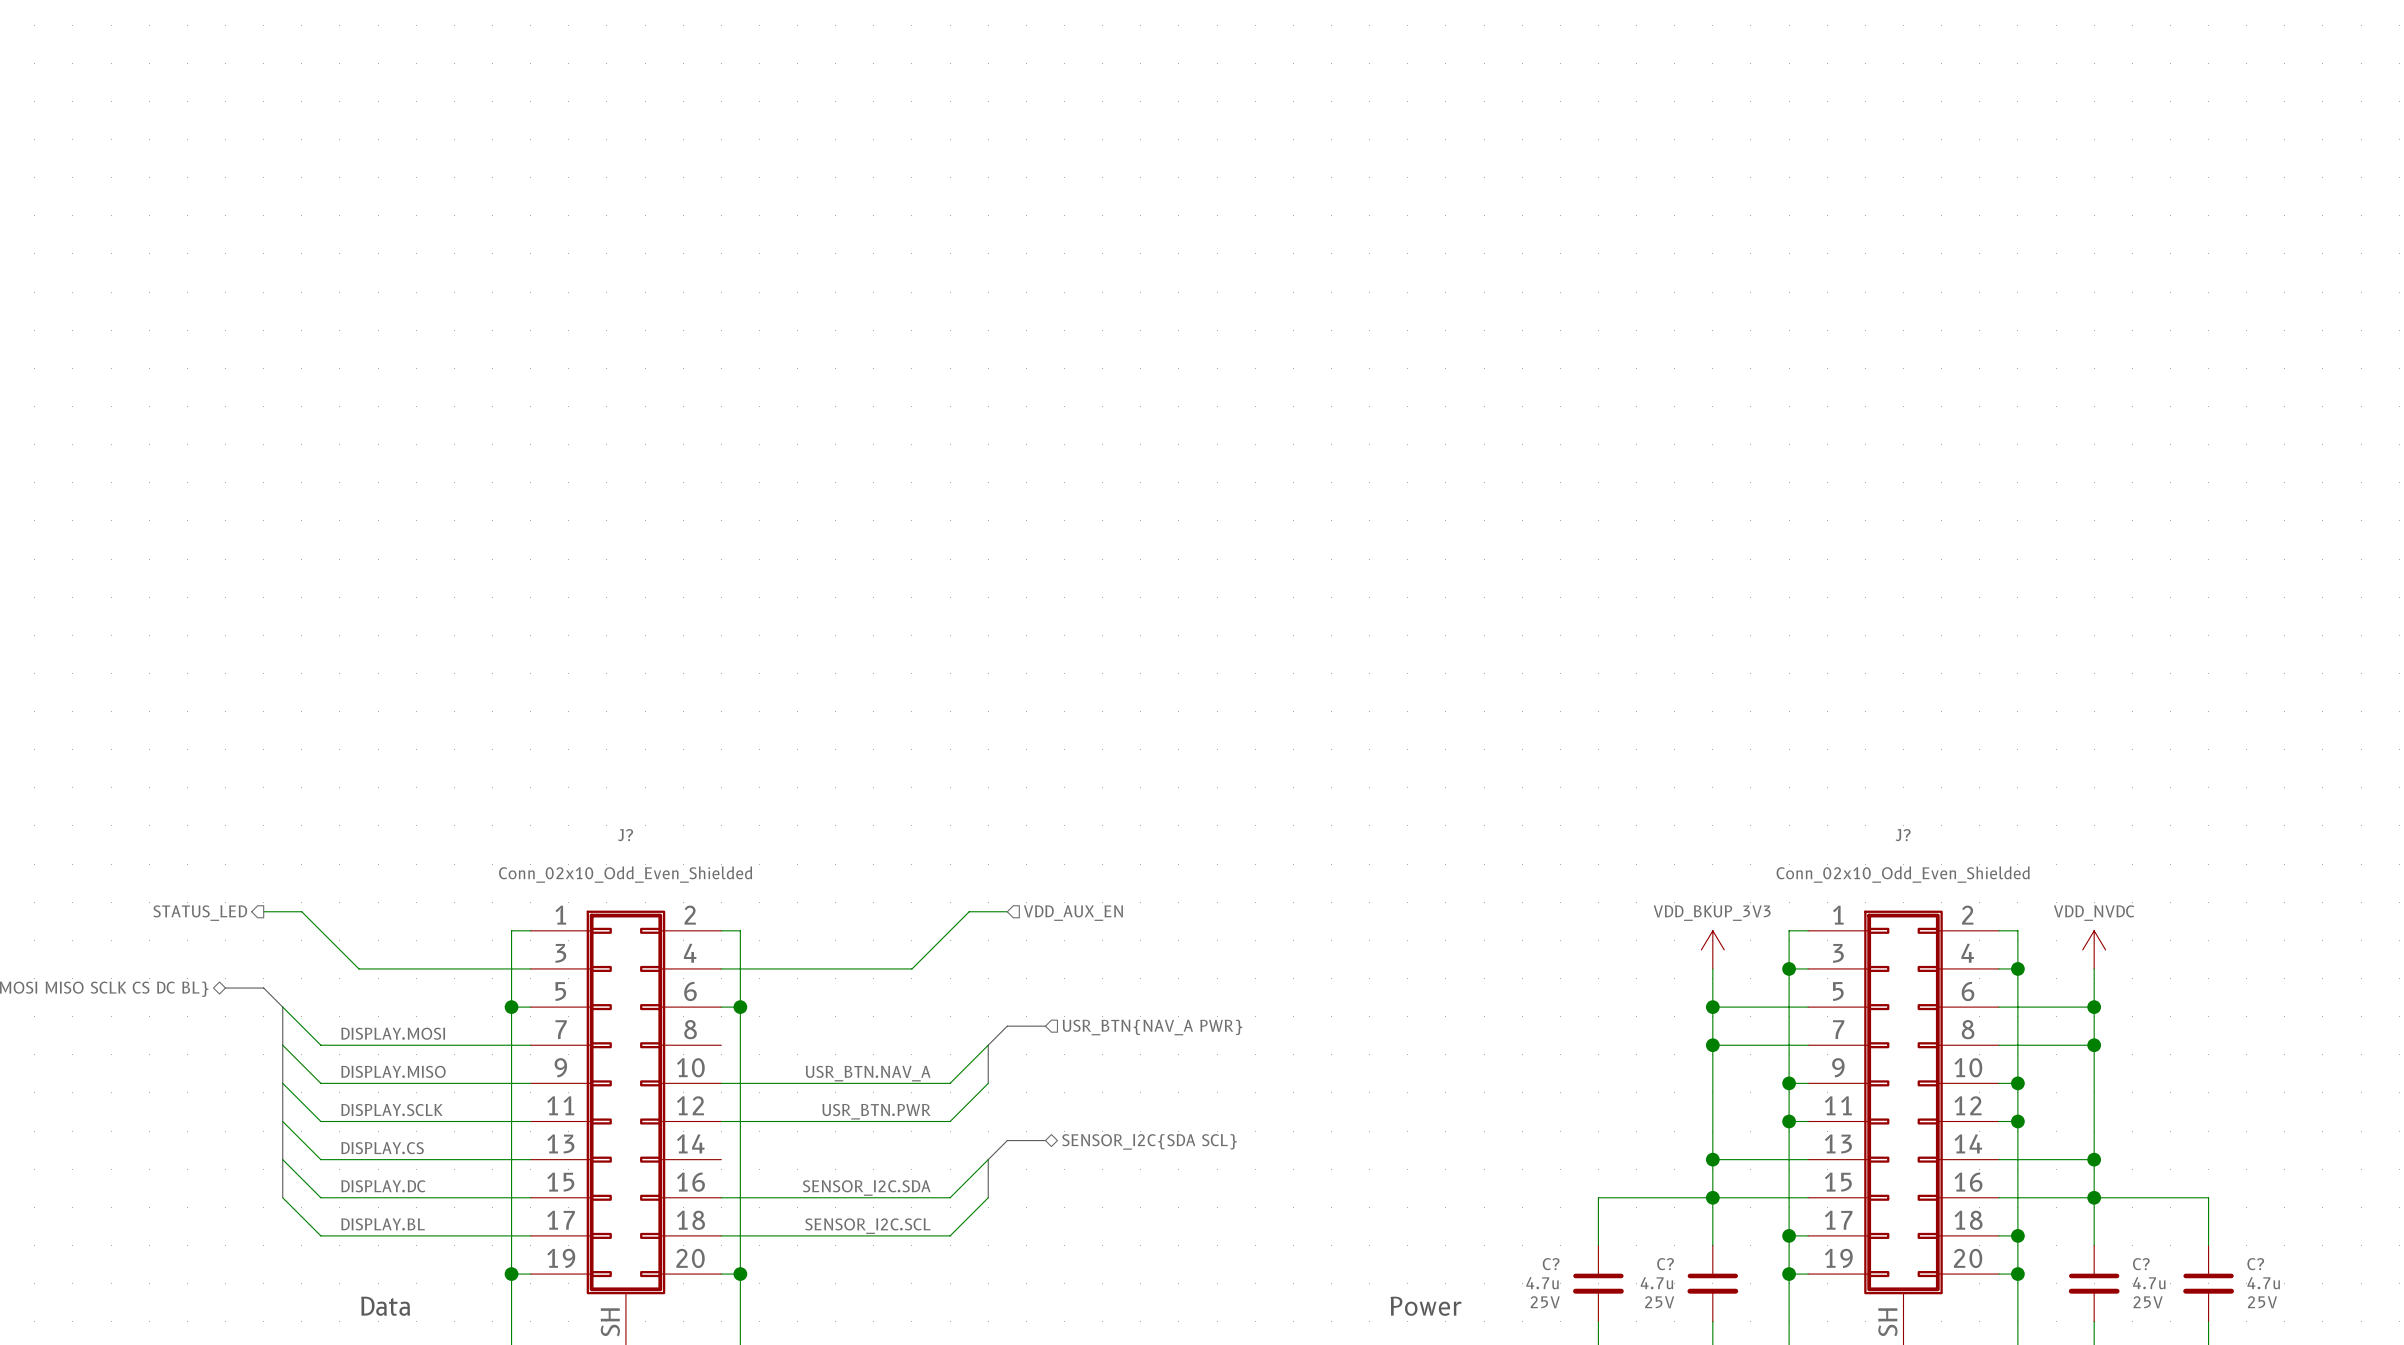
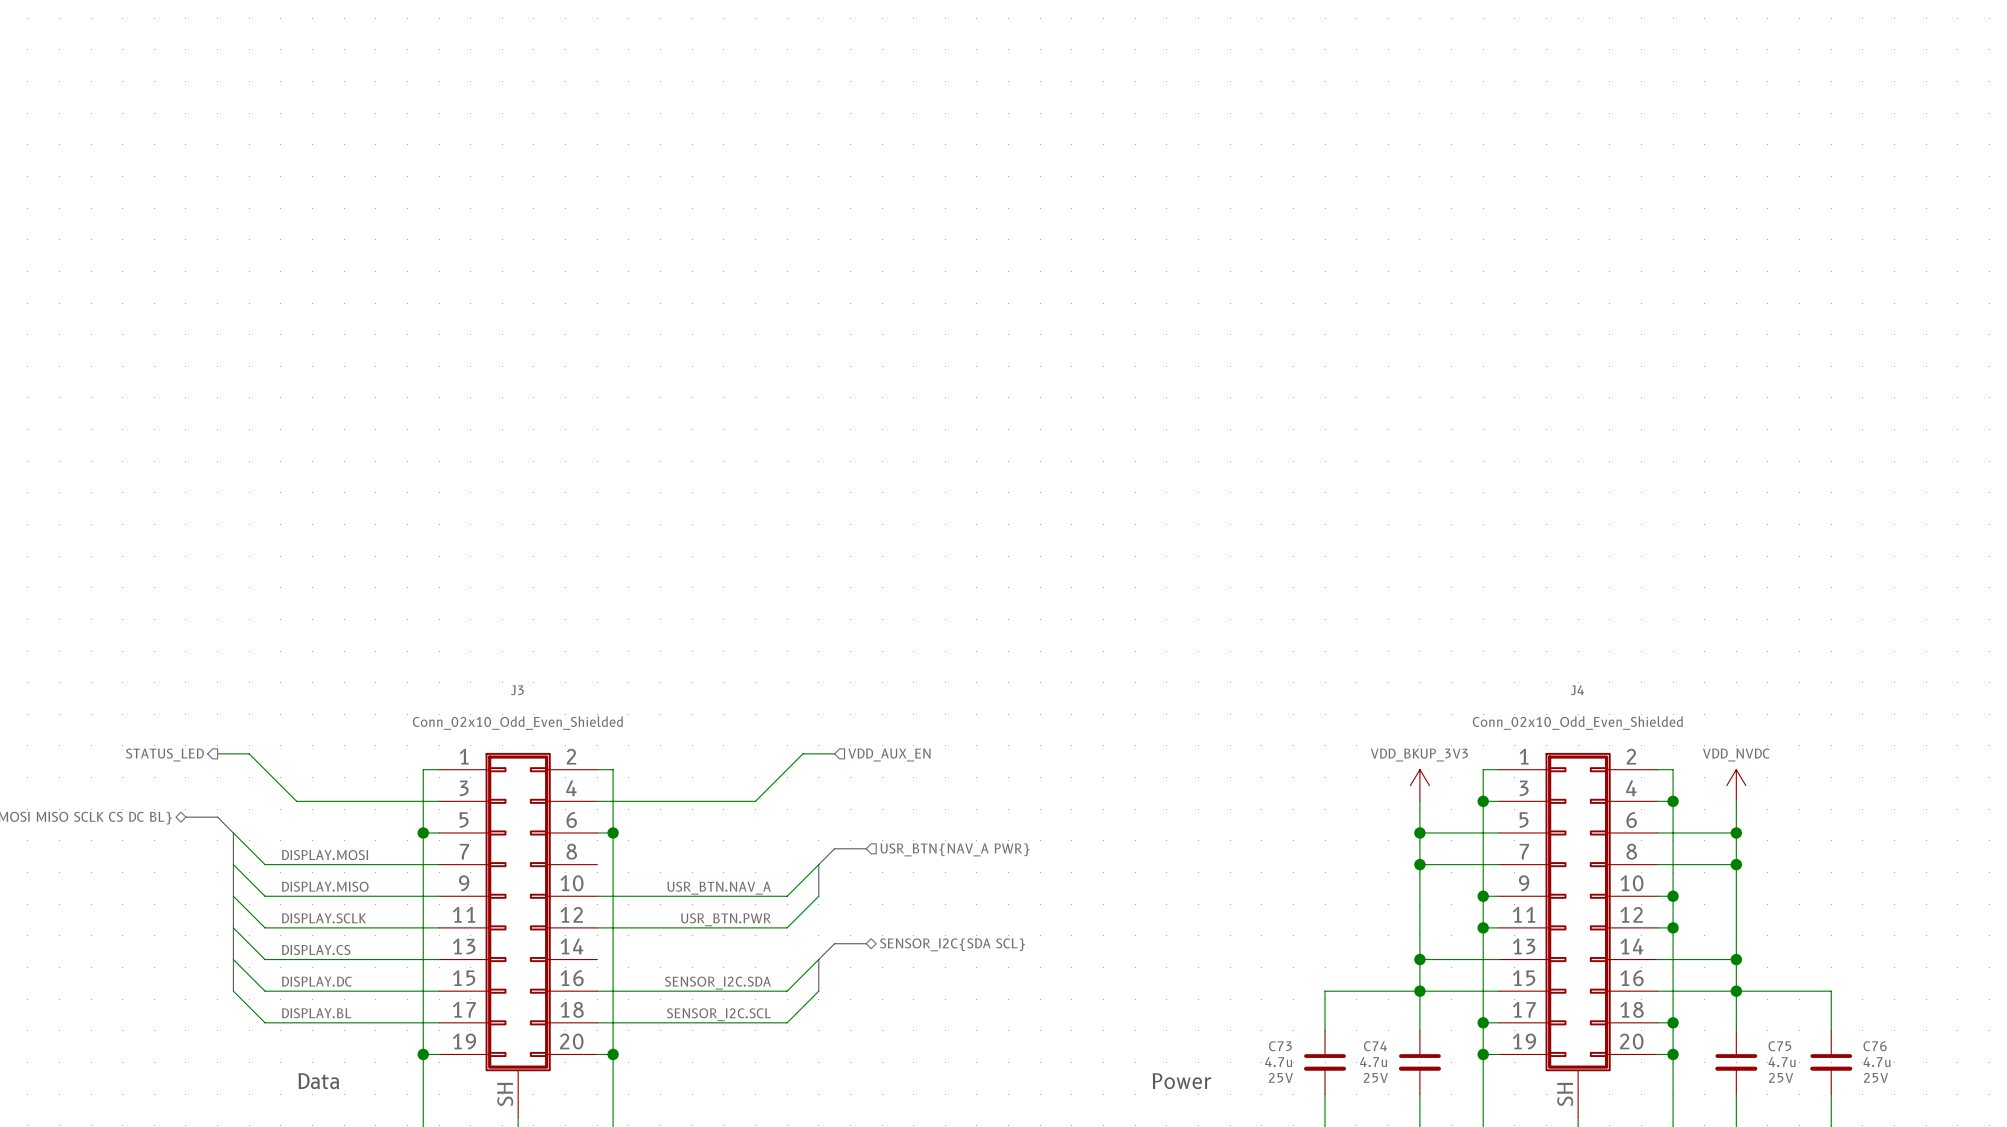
J? name: J? (625, 835) -> J3 (517, 690)
J? name: J? (1903, 835) -> J4 (1577, 690)
C? name: C? (1551, 1264) -> C73 (1280, 1046)
C? name: C? (1665, 1264) -> C74 (1375, 1046)
C? name: C? (2141, 1264) -> C75 (1779, 1046)
C? name: C? (2255, 1264) -> C76 (1875, 1046)

